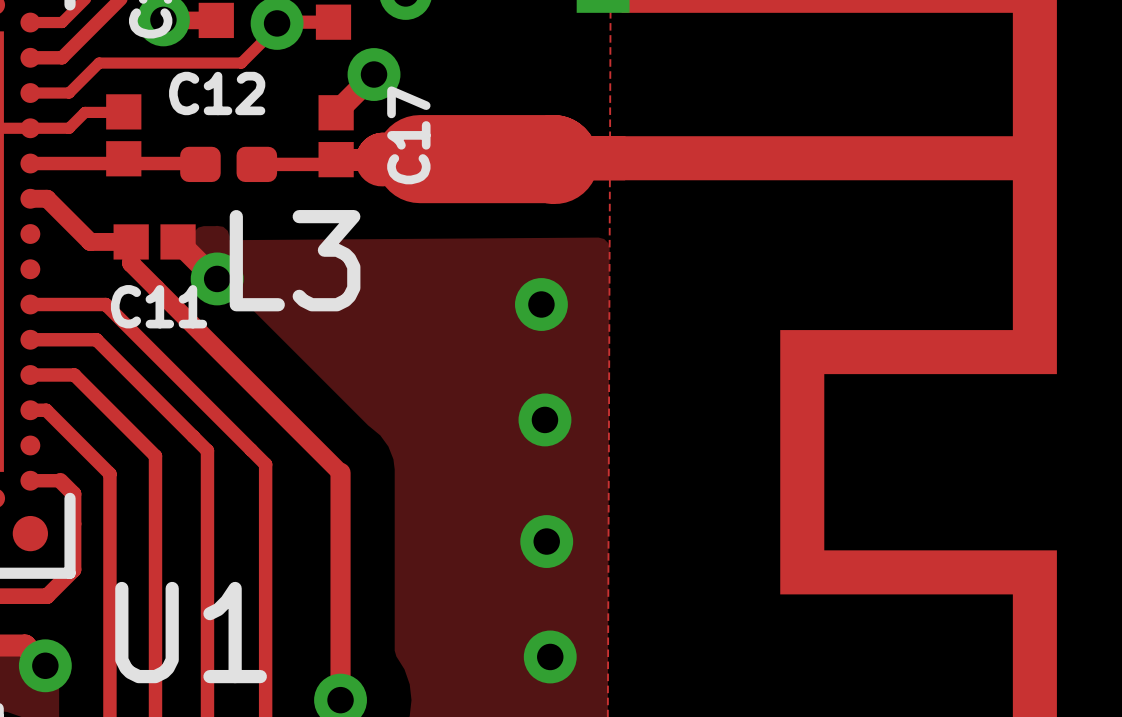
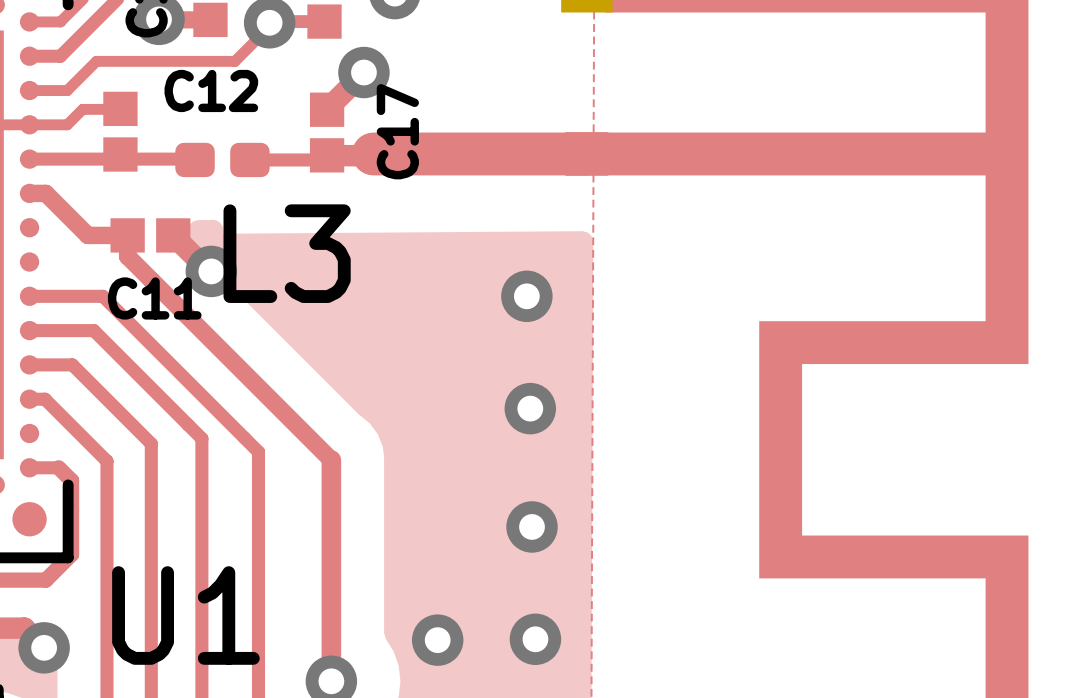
track: (382, 159) (553, 159) -> (373, 153) (586, 153)
via: none -> (437, 640)

